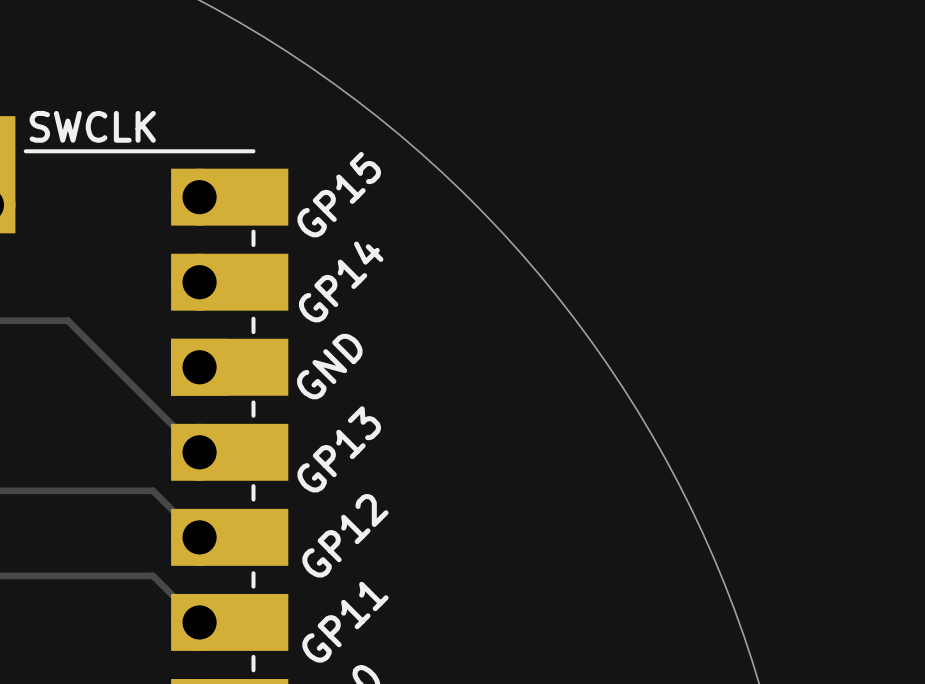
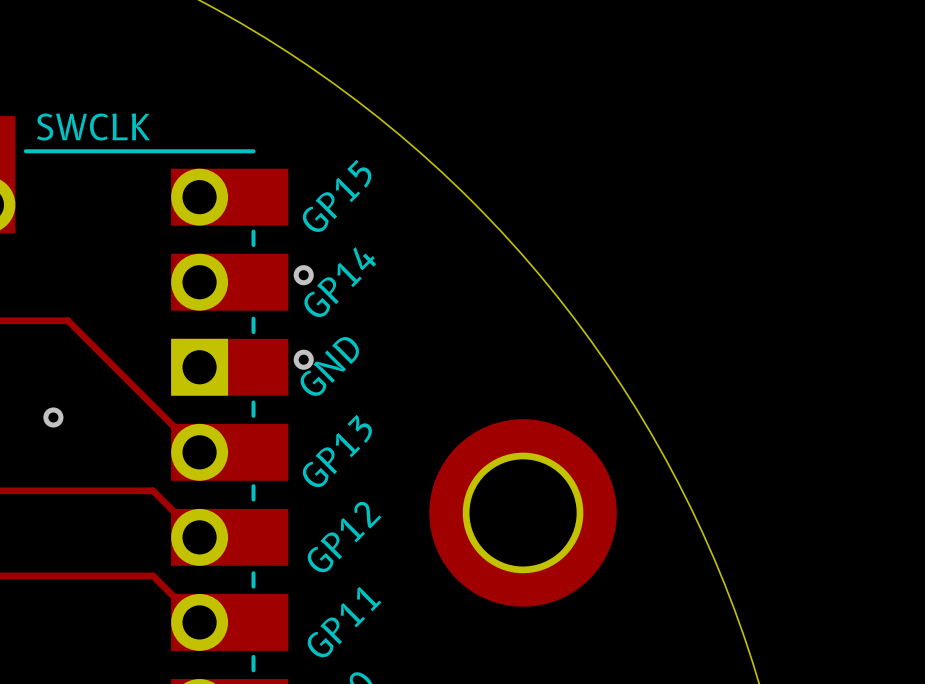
via: none -> (303, 275)
via: none -> (303, 359)
via: none -> (53, 417)
part: none -> (523, 512)

